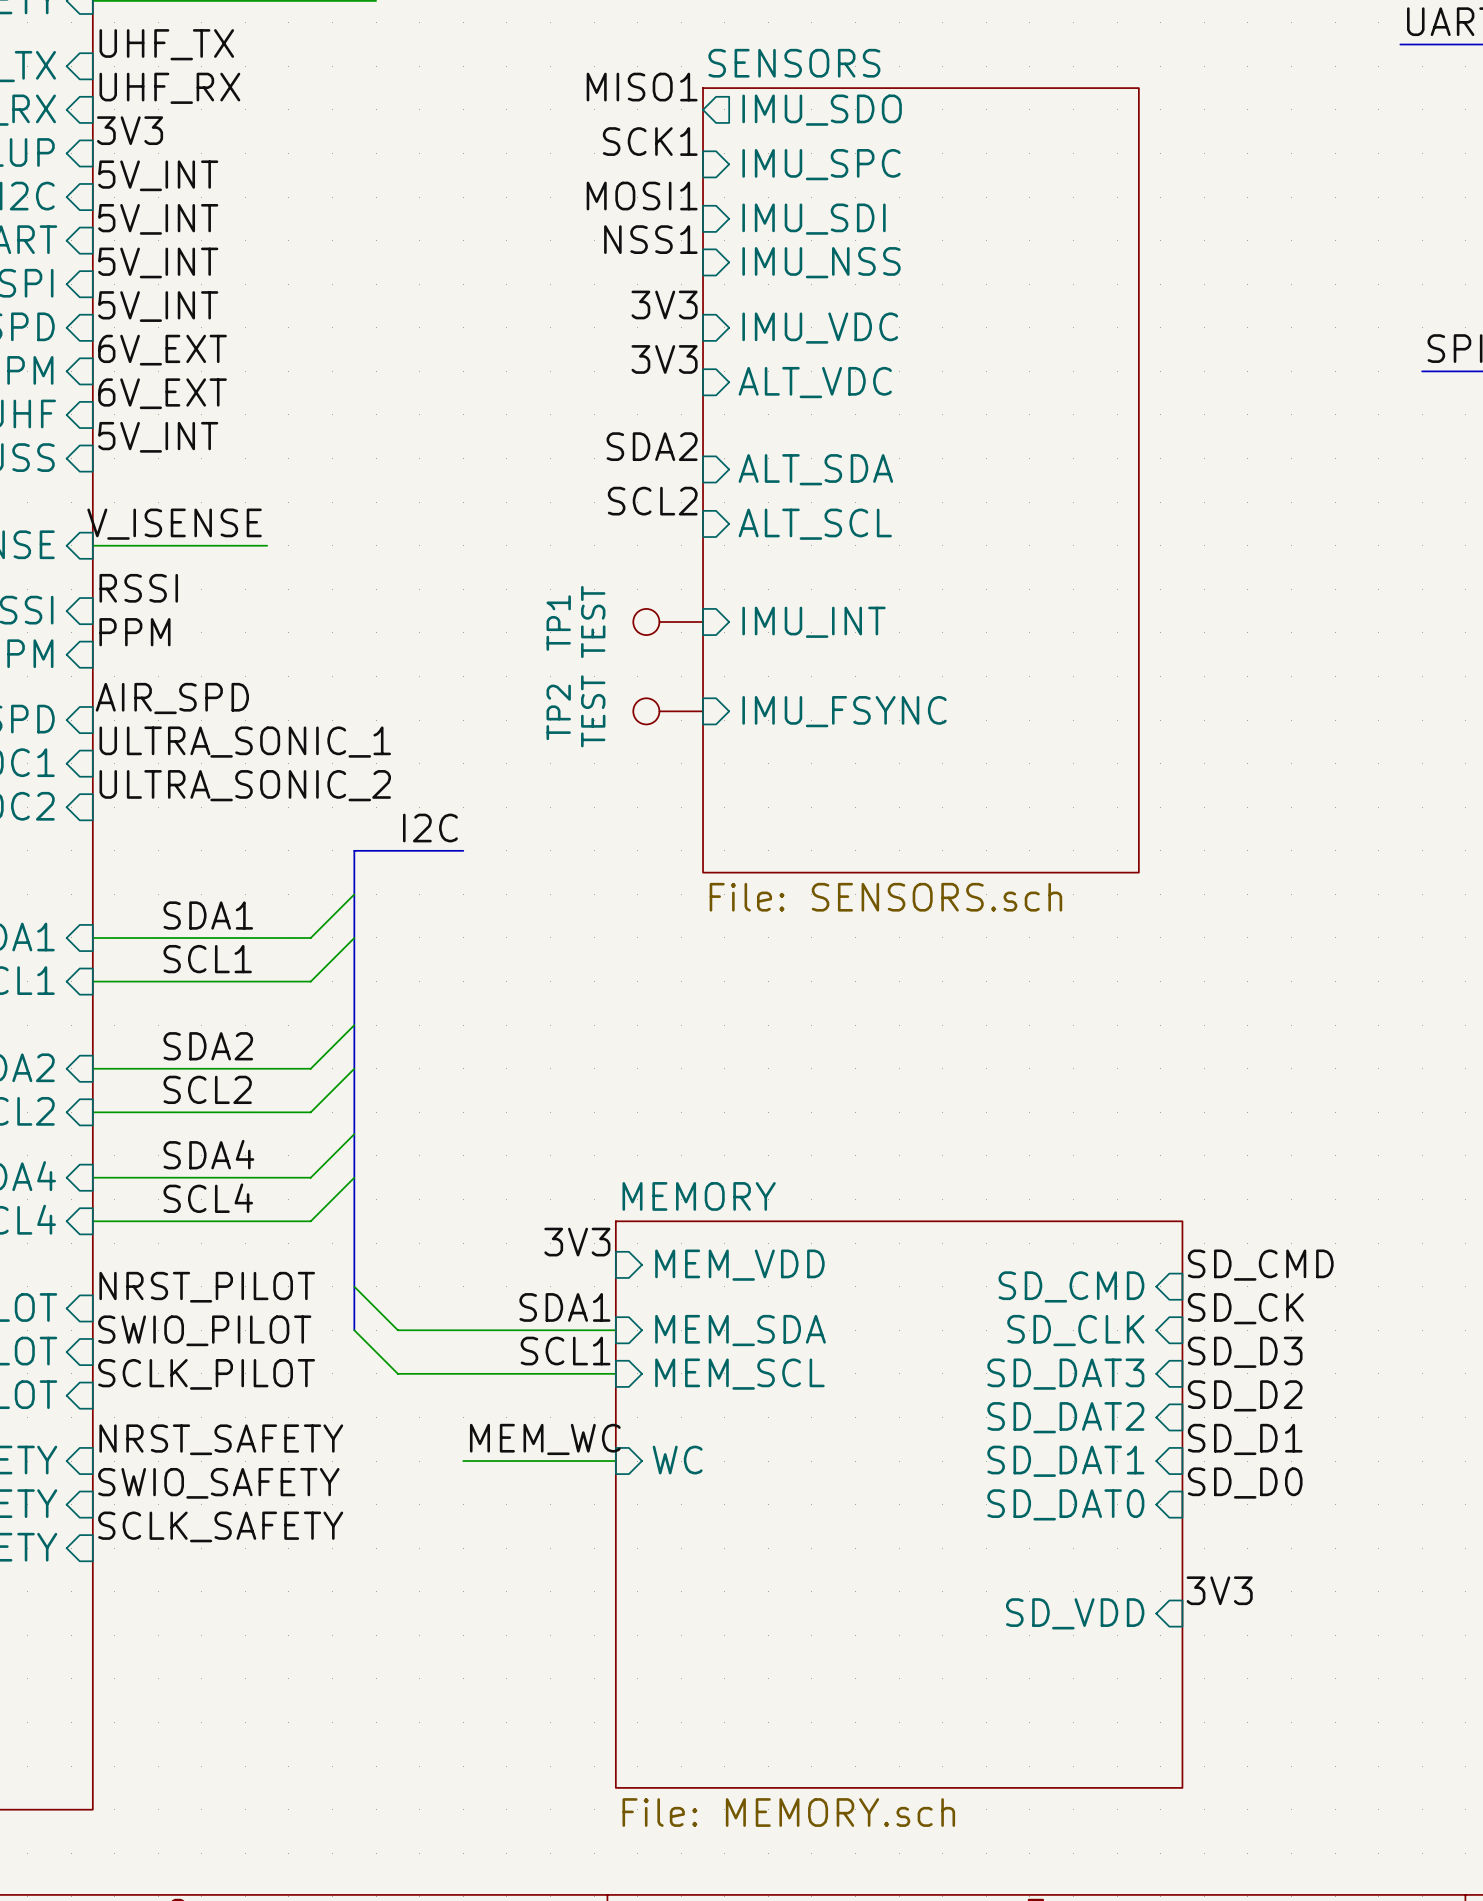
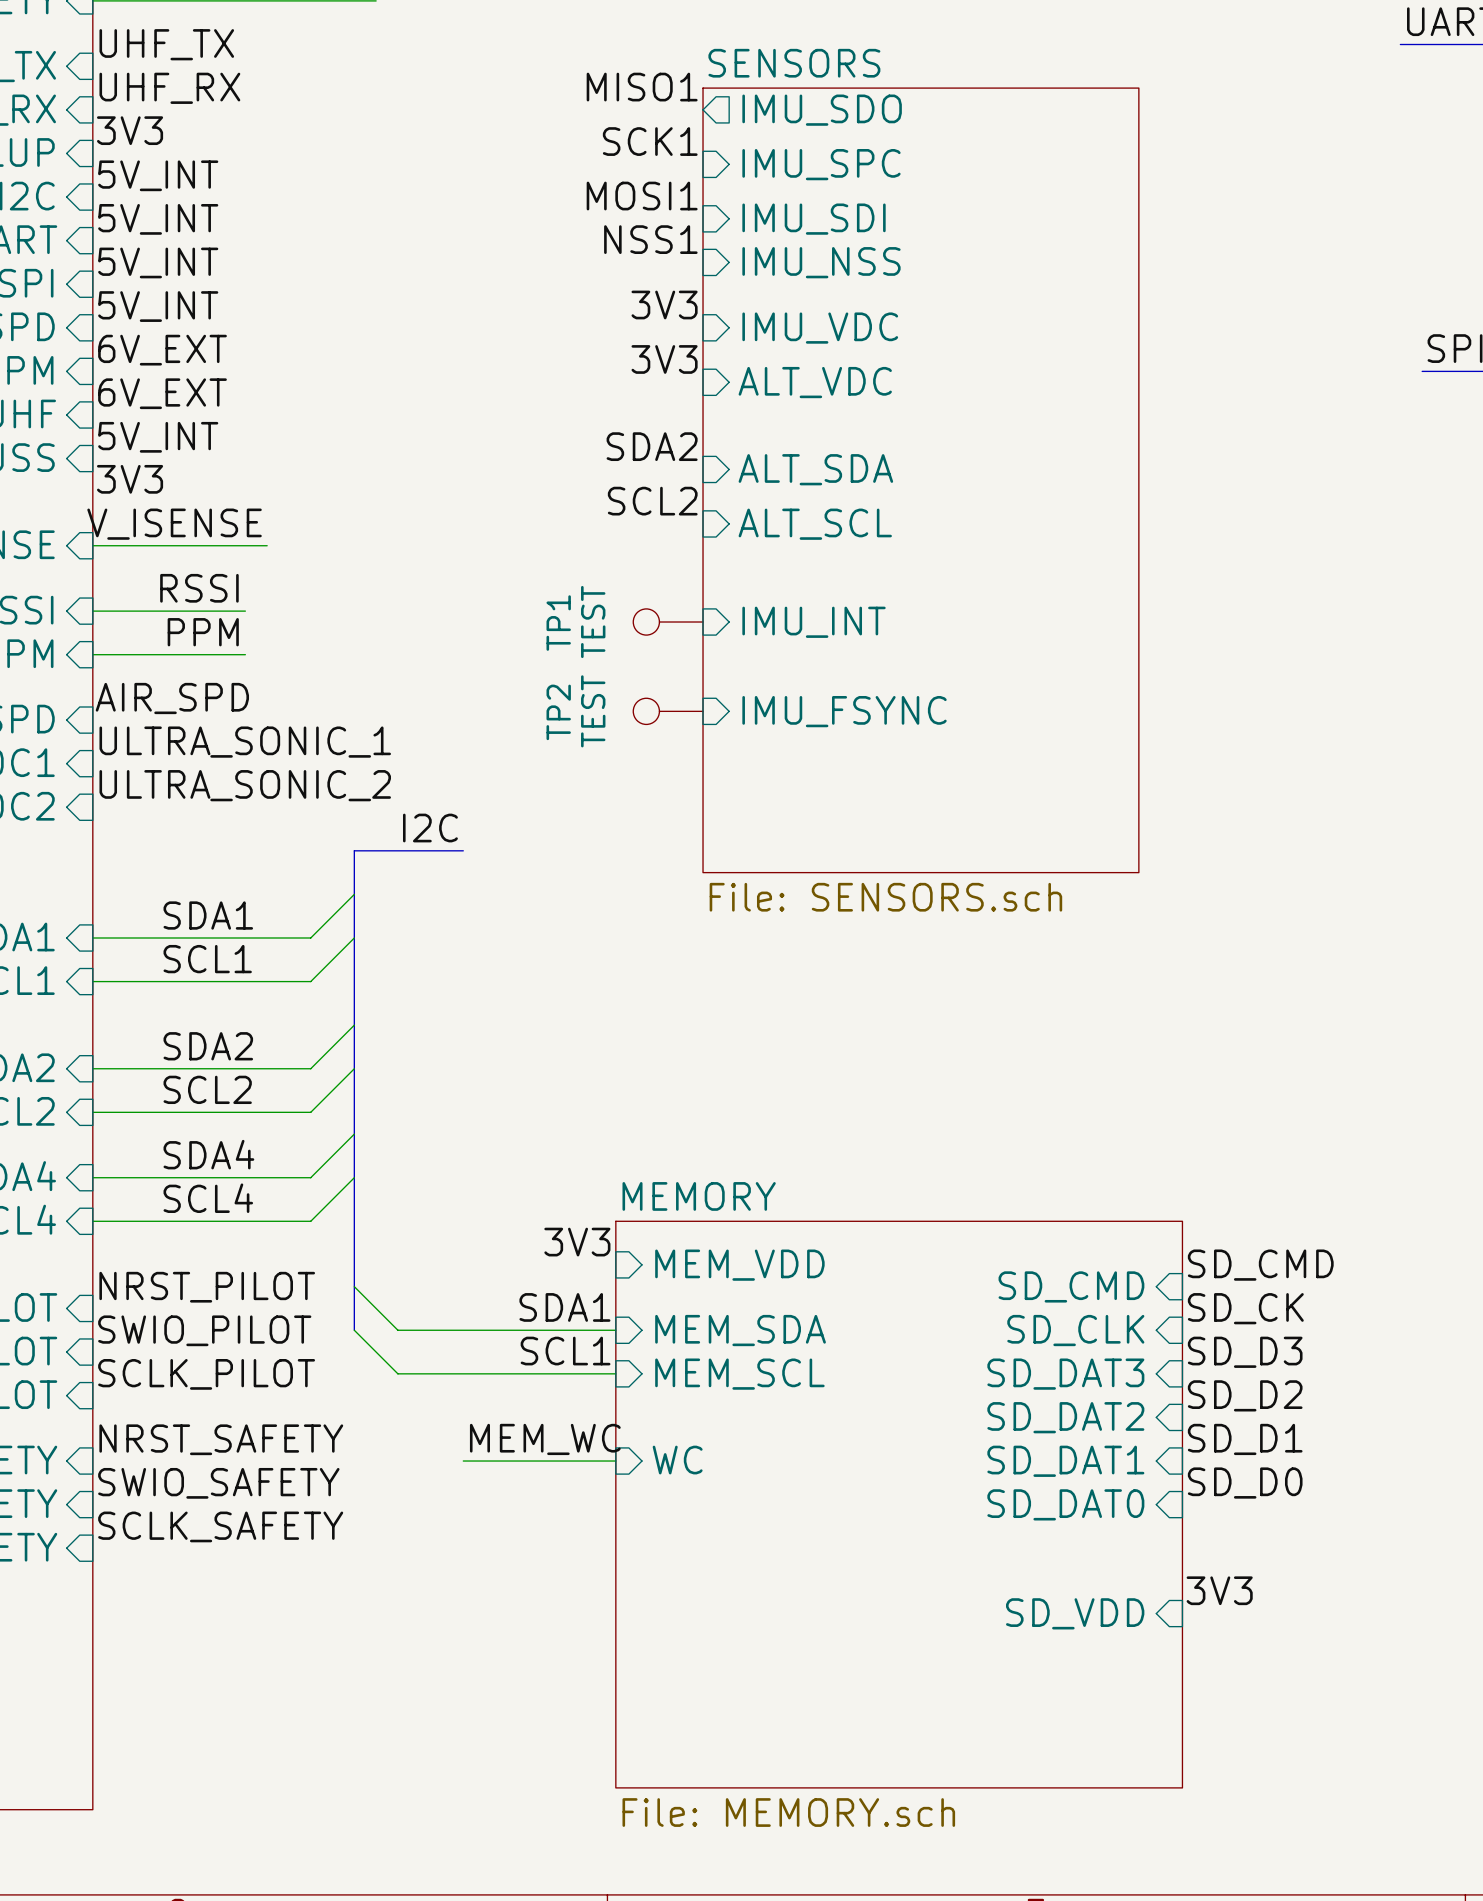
label: none -> 3V3 (130, 479)
label position: RSSI (138, 588) -> RSSI (199, 588)
wire: none -> (92, 611) (245, 611)
label position: PPM (134, 632) -> PPM (203, 632)
wire: none -> (92, 654) (245, 654)

